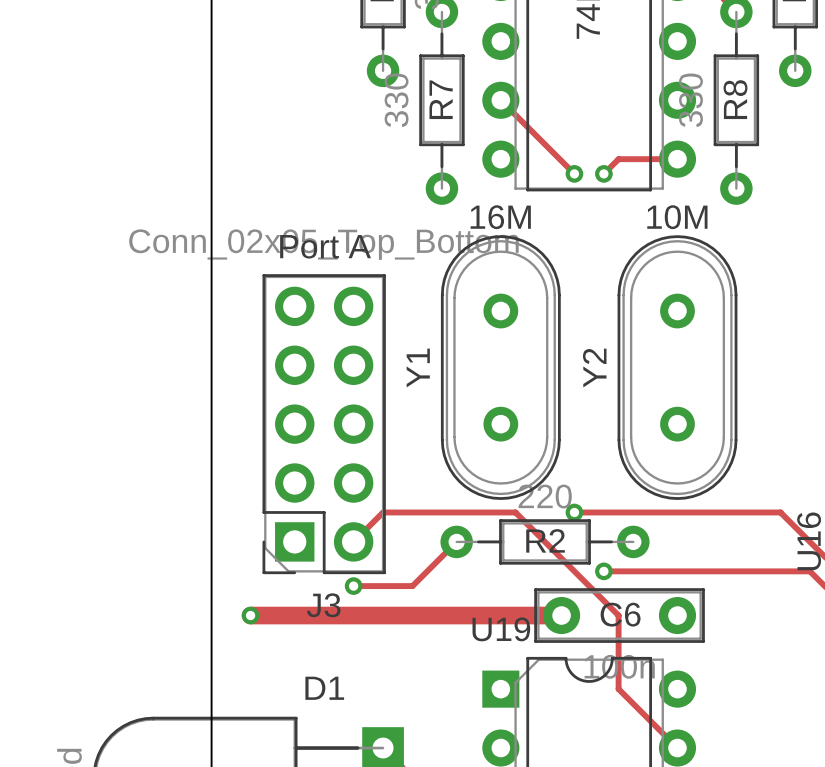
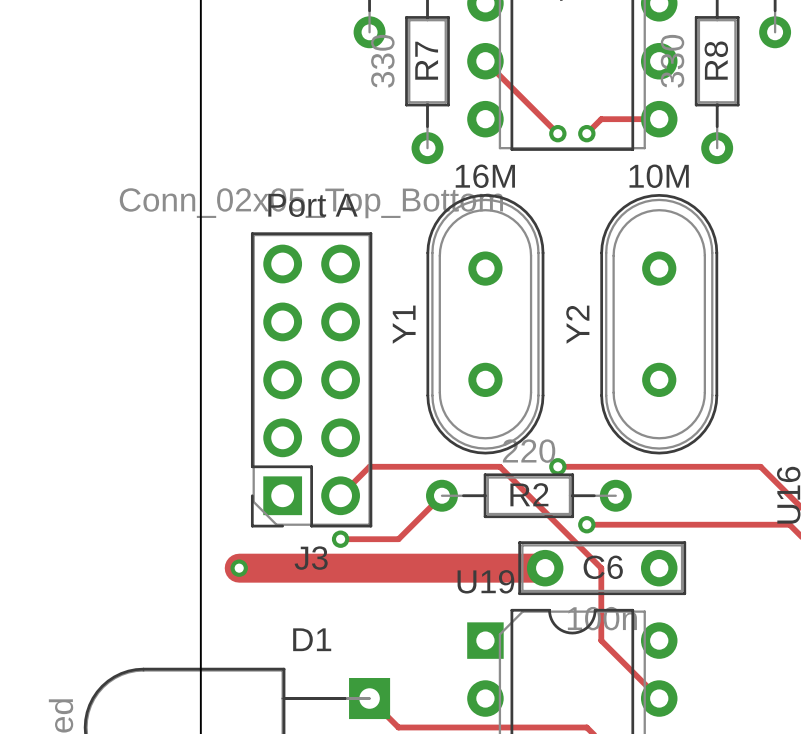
track width: thin (250, 615) (561, 615) -> thick (239, 568) (545, 568)

